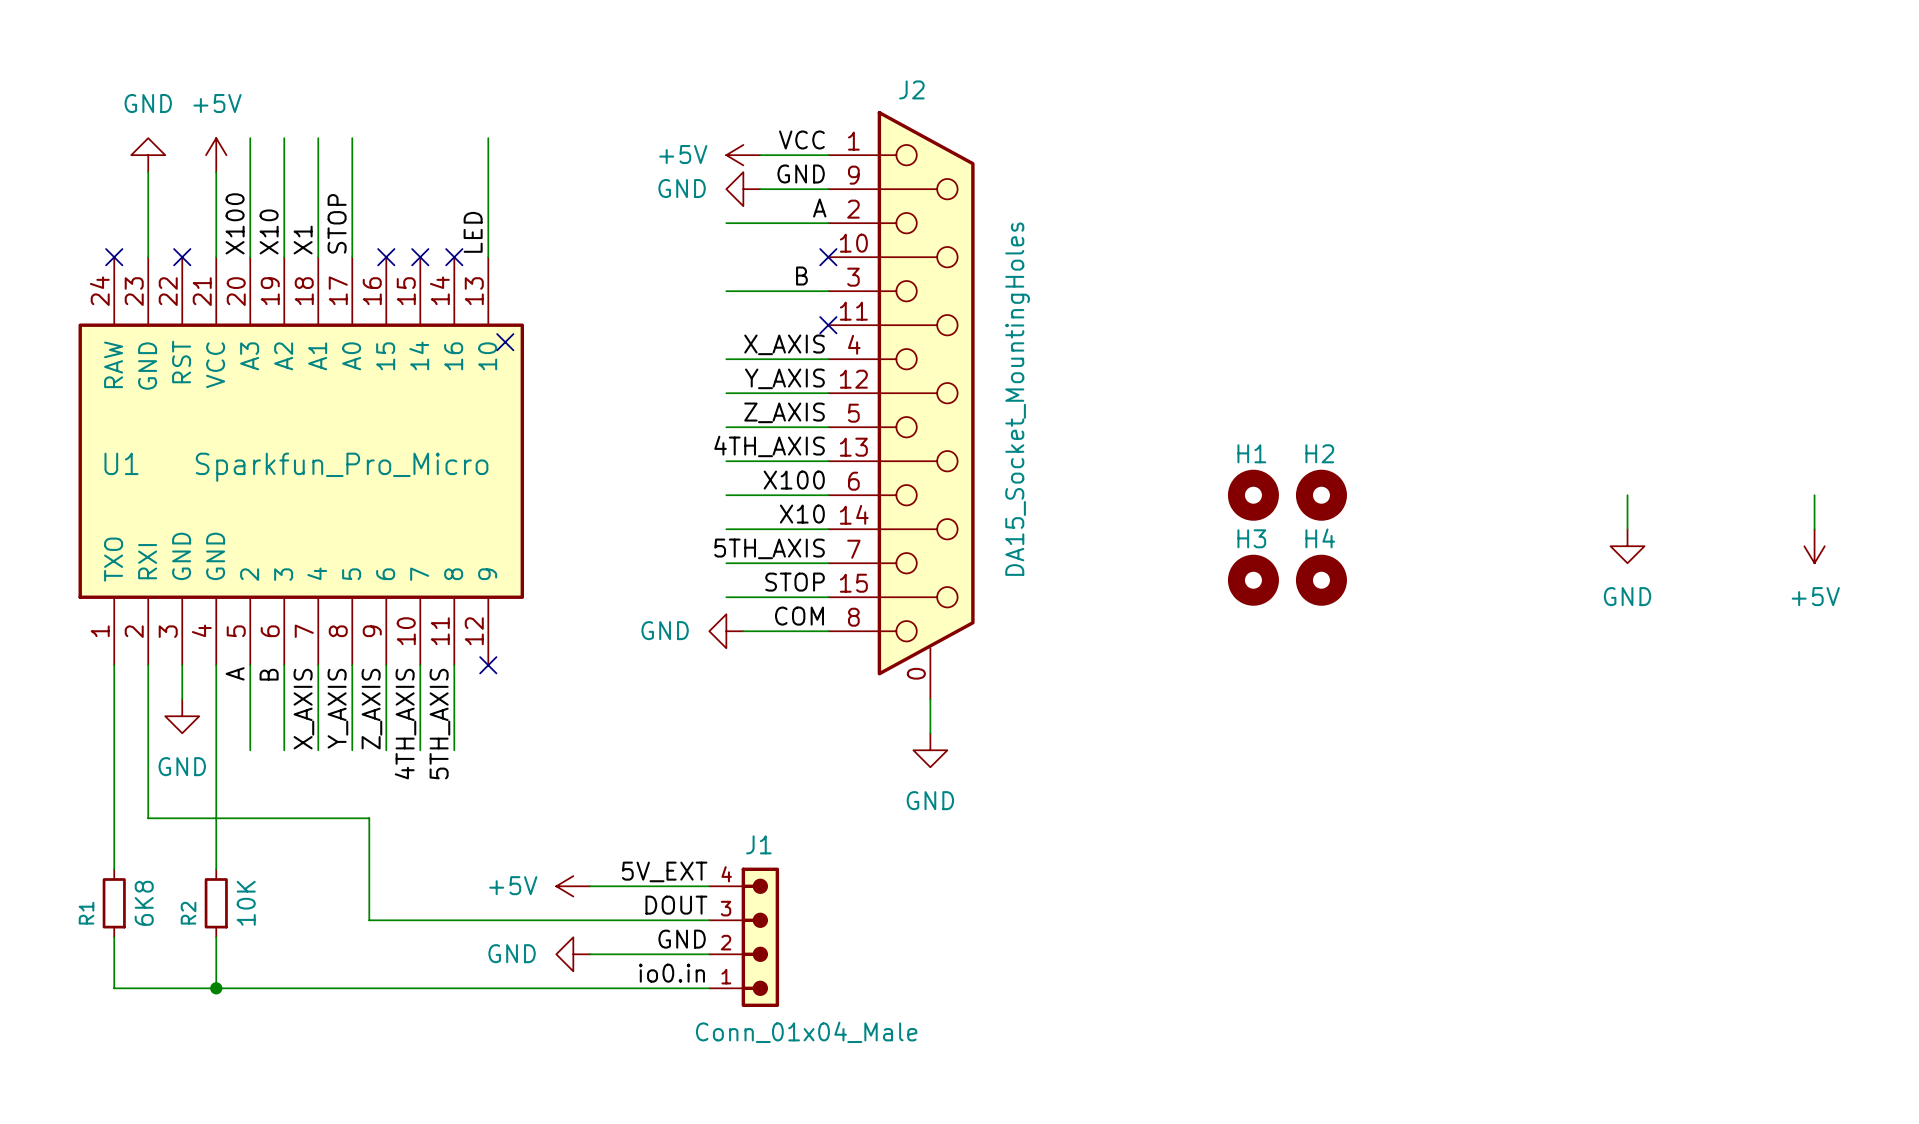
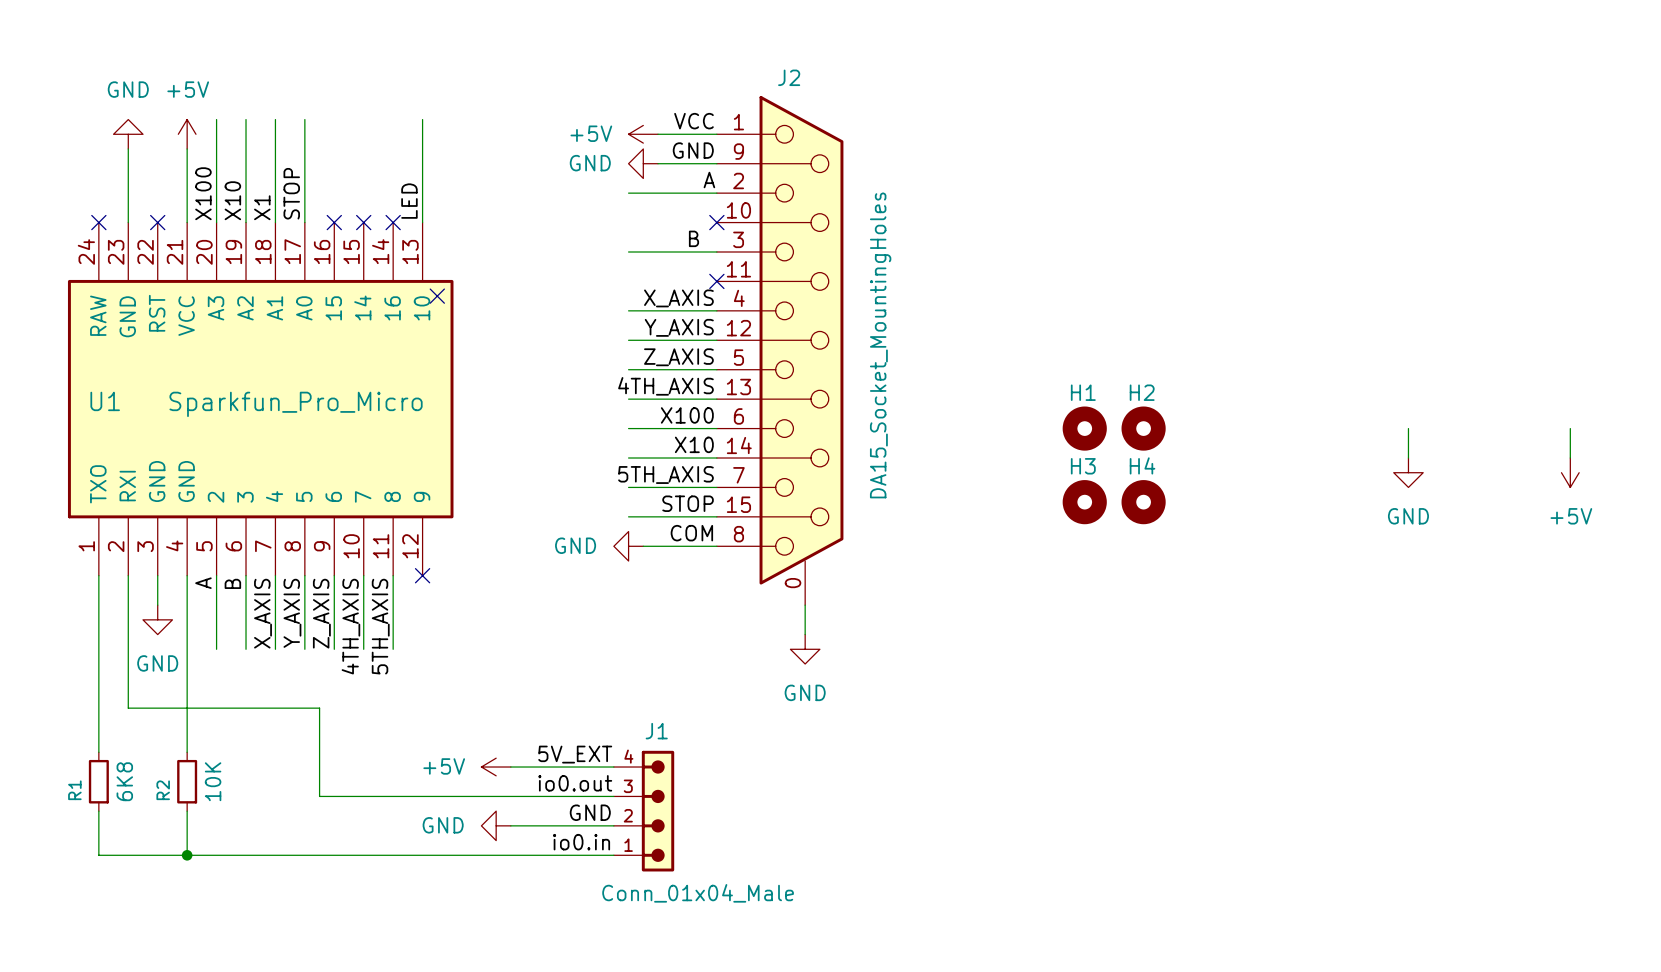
label: DOUT (676, 905) -> io0.out (575, 783)

